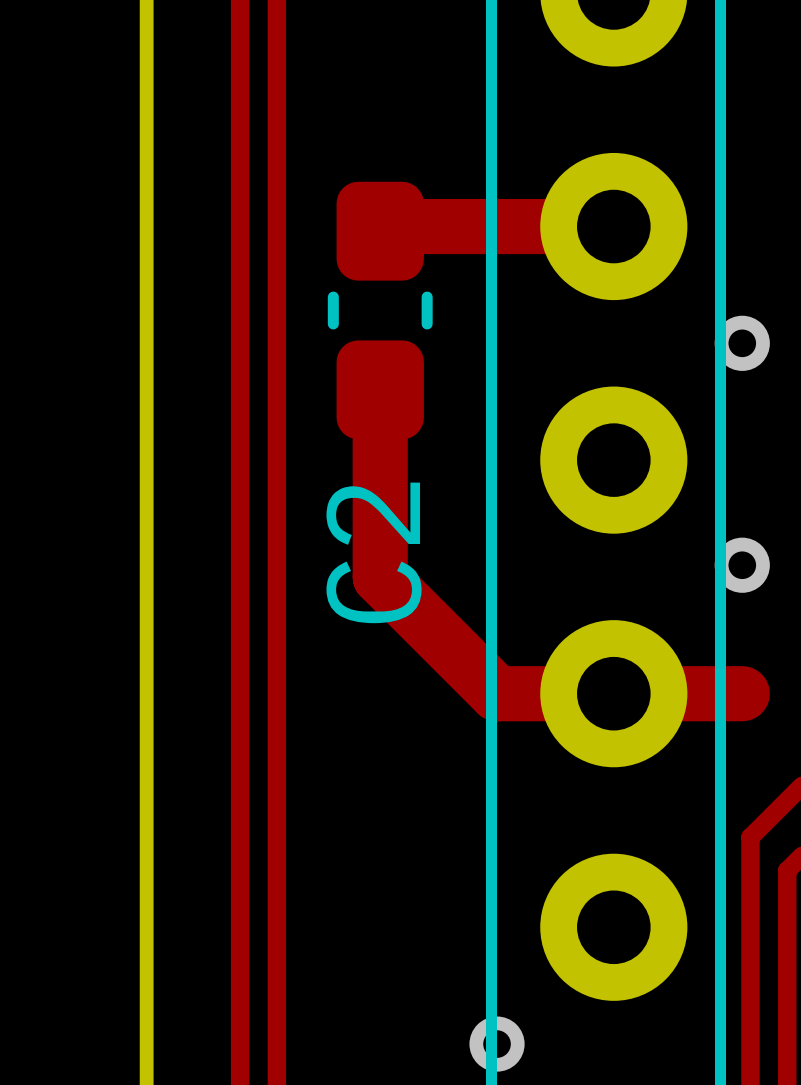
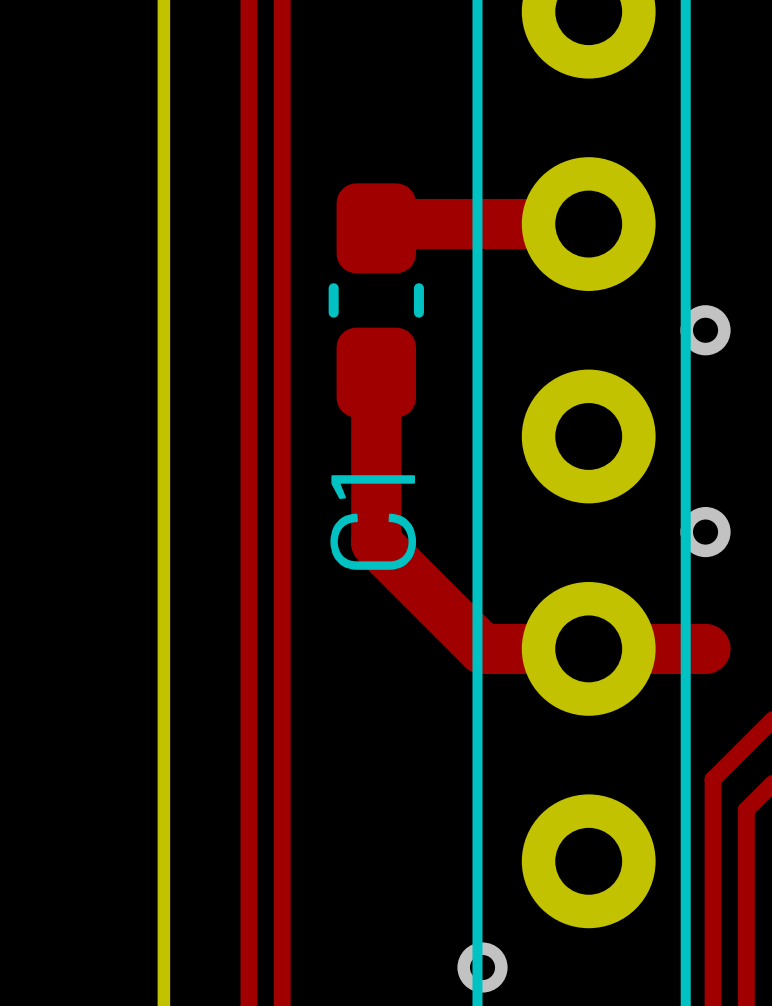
C2 name: C2 (374, 552) -> C1 (373, 522)

